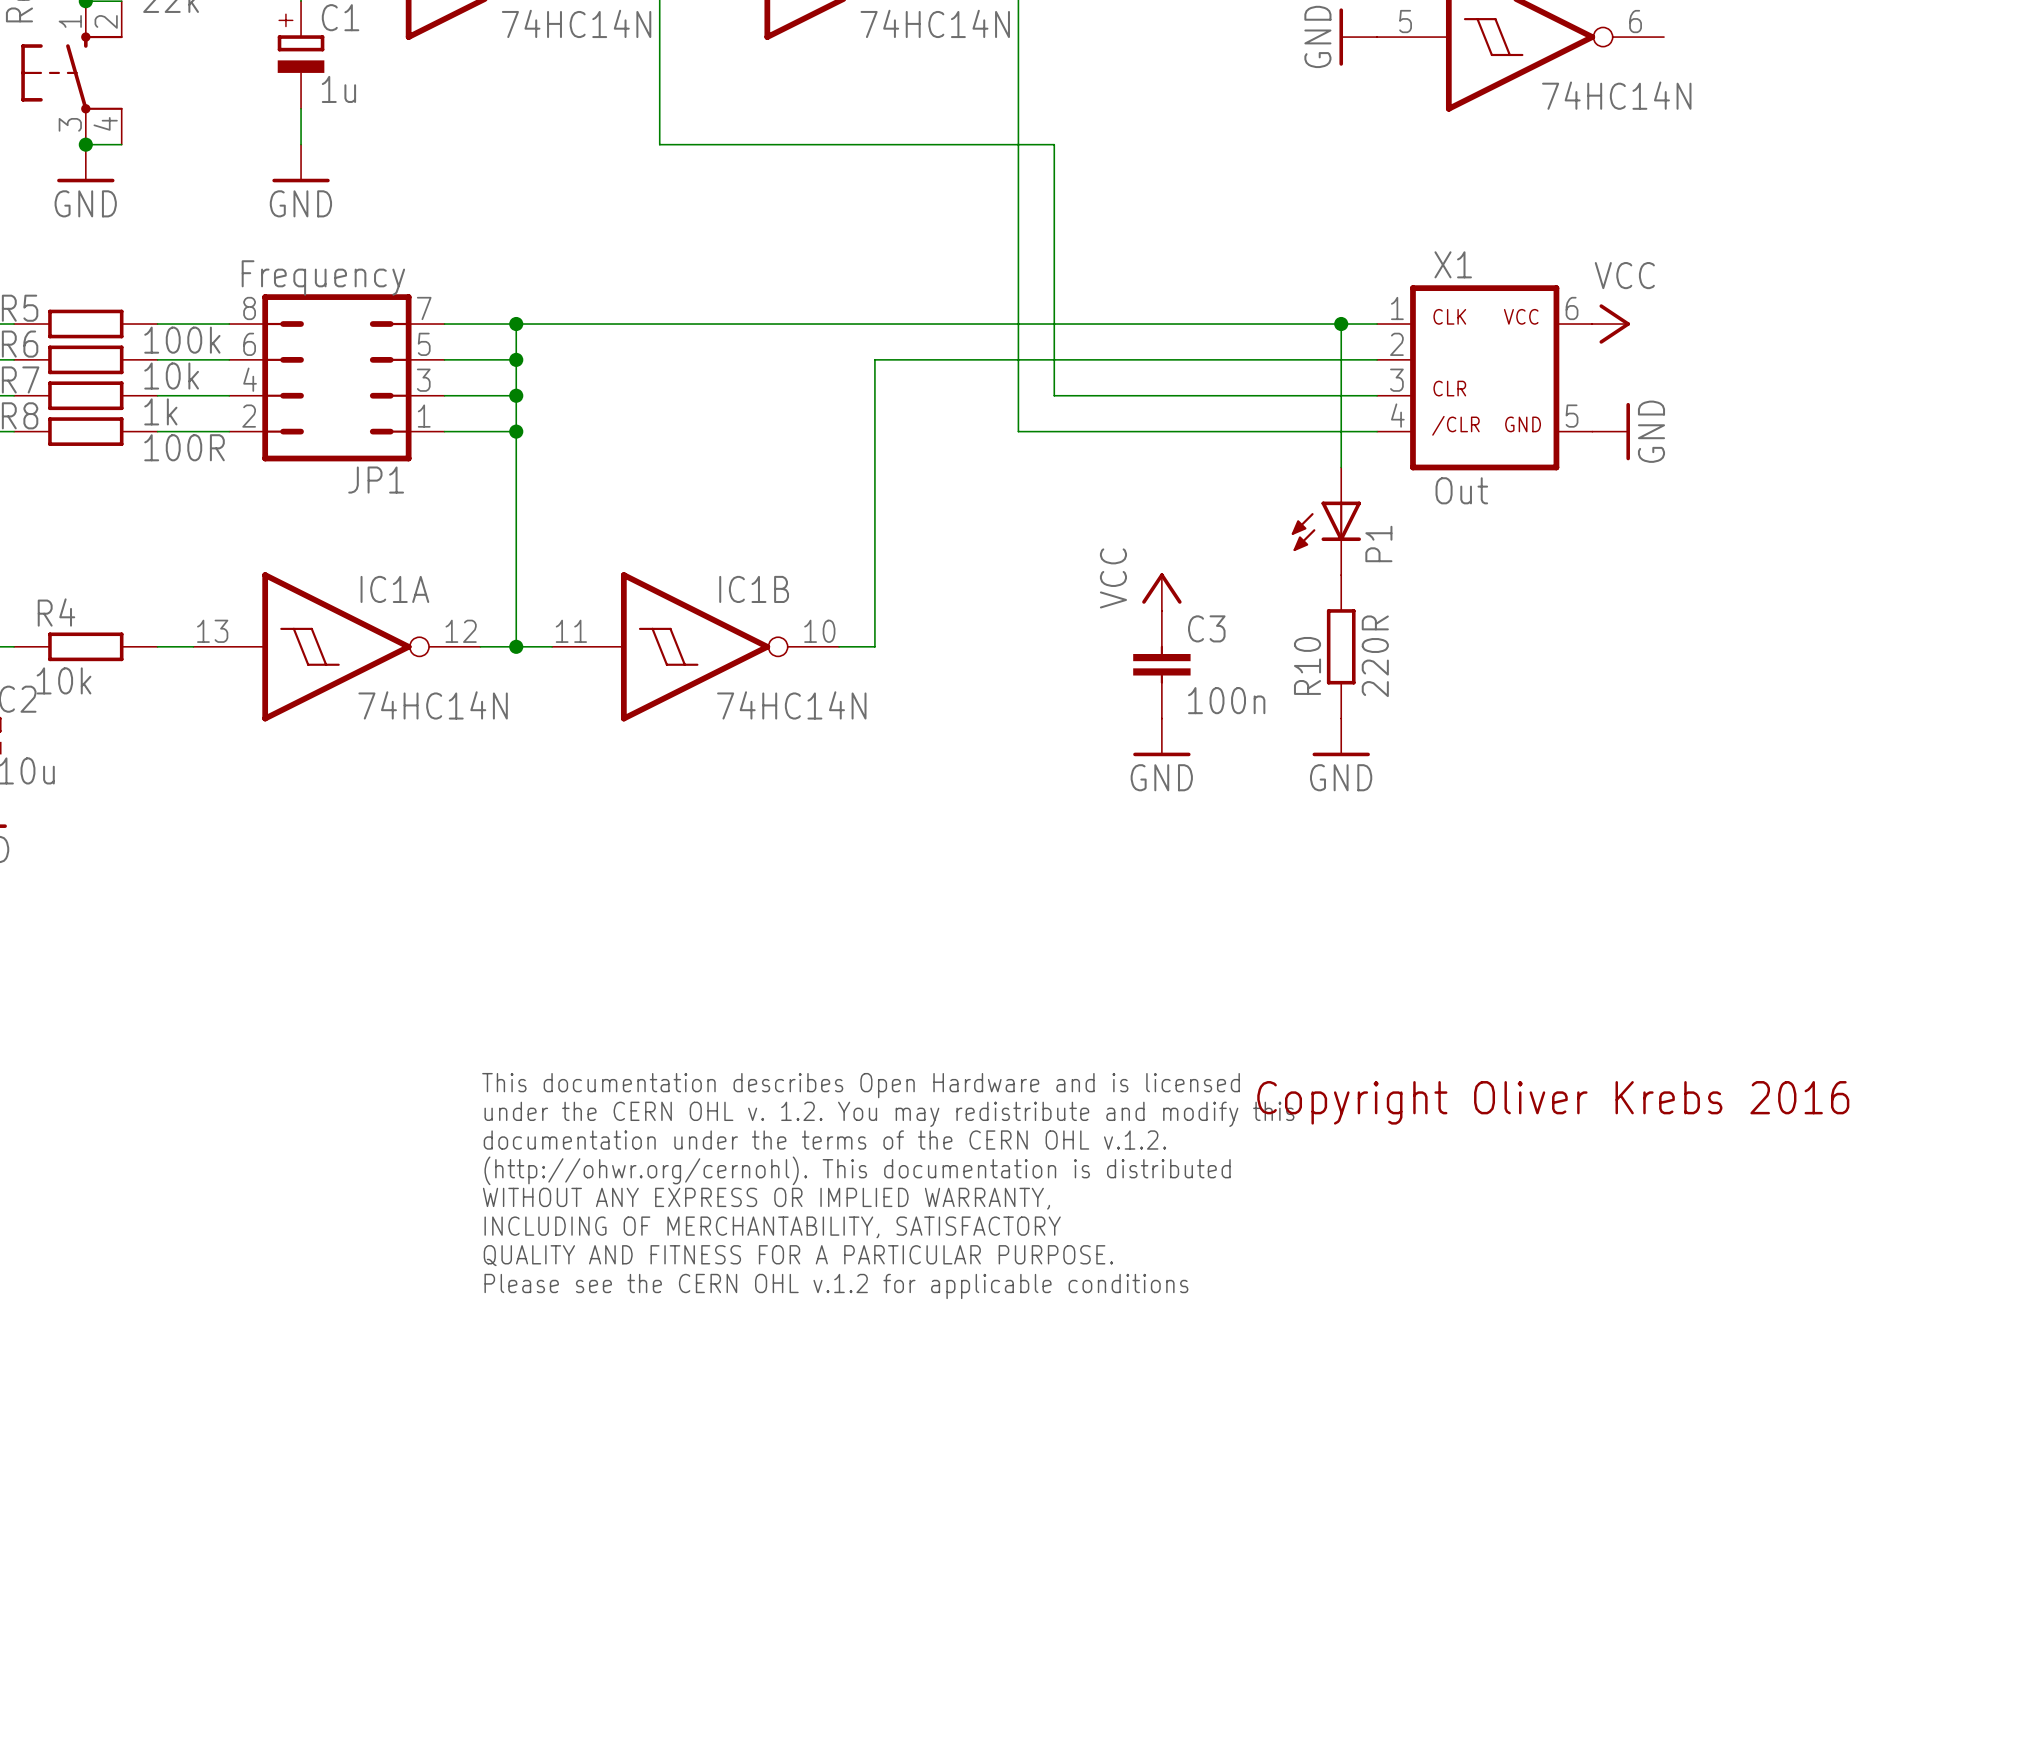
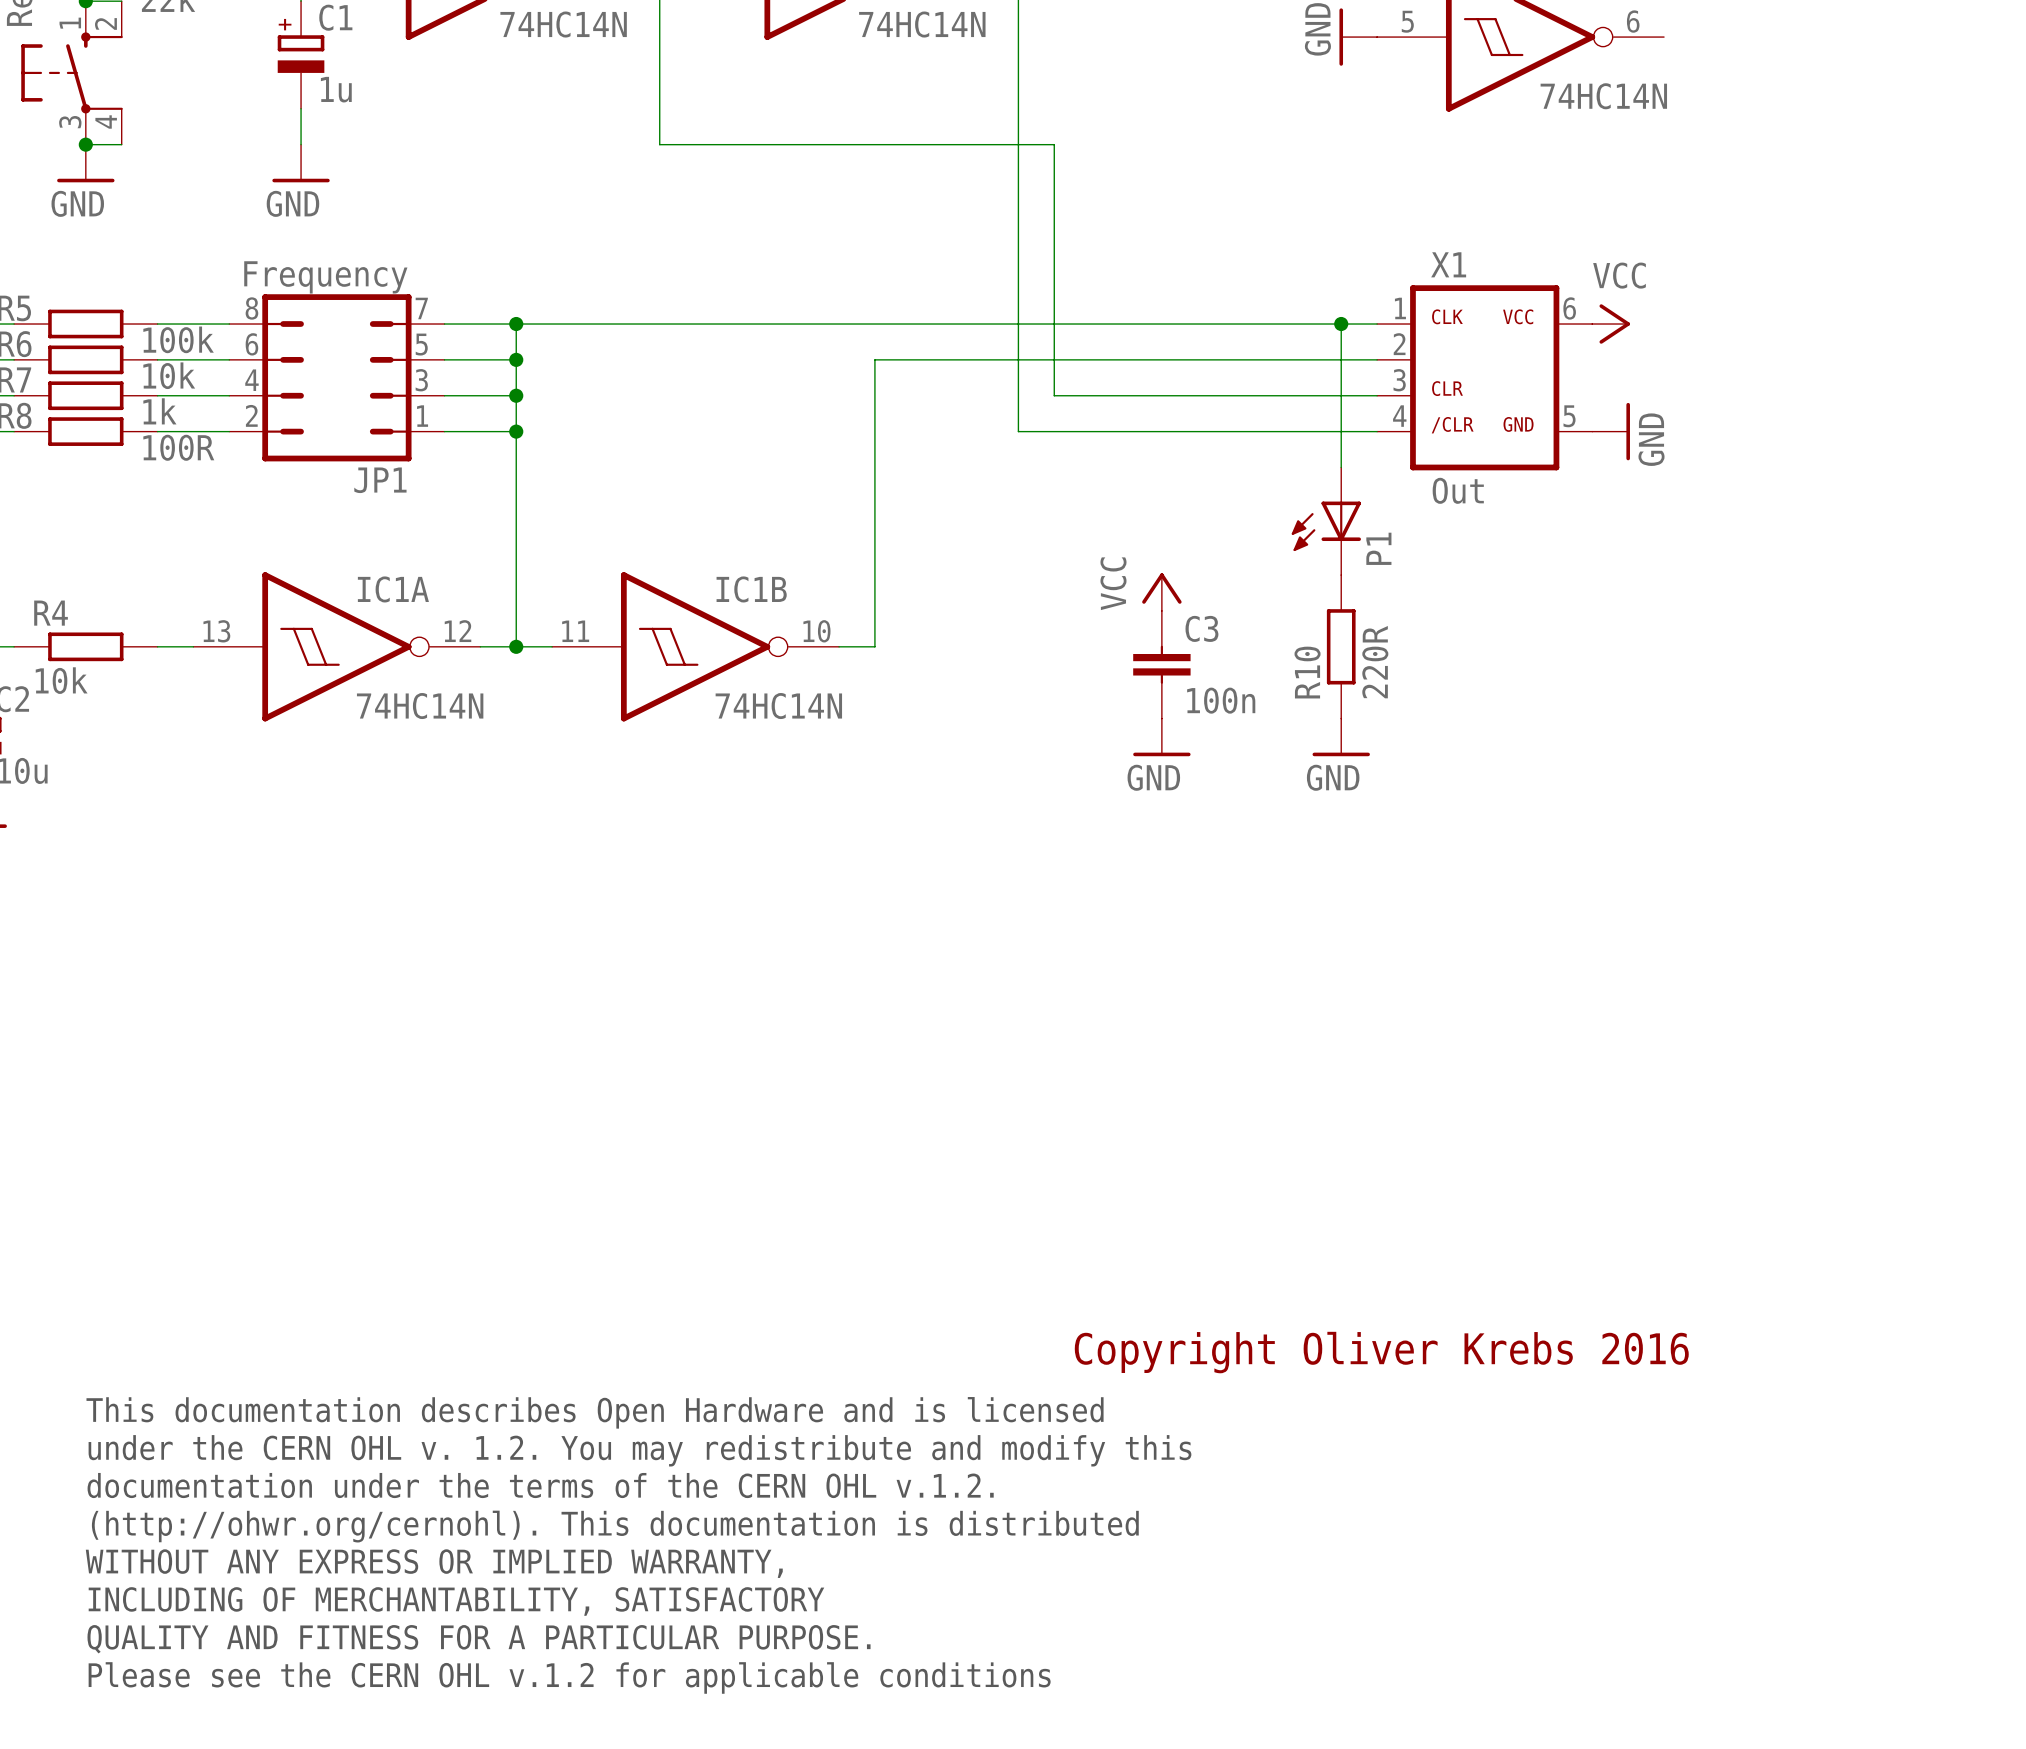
text: This documentation describes Open Hardware and is licensed (861, 1085) -> none
text position: Copyright Oliver Krebs 2016 (1553, 1102) -> Copyright Oliver Krebs 2016 (1381, 1352)
text: under the CERN OHL v. 1.2. You may redistribute and modify this (889, 1114) -> none
text: documentation under the terms of the CERN OHL v.1.2. (824, 1140) -> none
text: (http://ohwr.org/cernohl). This documentation is distributed (857, 1170) -> none
text: WITHOUT ANY EXPRESS OR IMPLIED WARRANTY, (766, 1198) -> none
text: INCLUDING OF MERCHANTABILITY, SATISFACTORY (772, 1227) -> none
text: QUALITY AND FITNESS FOR A PARTICULAR PURPOSE. (798, 1255) -> none
text: Please see the CERN OHL v.1.2 for applicable conditions (836, 1286) -> none
text: none -> This documentation describes Open Hardware and is licensed (595, 1412)
text: none -> under the CERN OHL v. 1.2. You may redistribute and modify this (639, 1450)
text: none -> documentation under the terms of the CERN OHL v.1.2. (540, 1485)
text: none -> (http://ohwr.org/cernohl). This documentation is distributed (615, 1526)
text: none -> WITHOUT ANY EXPRESS OR IMPLIED WARRANTY, (434, 1563)
text: none -> INCLUDING OF MERCHANTABILITY, SATISFACTORY (456, 1601)
text: none -> QUALITY AND FITNESS FOR A PARTICULAR PURPOSE. (479, 1639)
text: none -> Please see the CERN OHL v.1.2 for applicable conditions (569, 1677)

